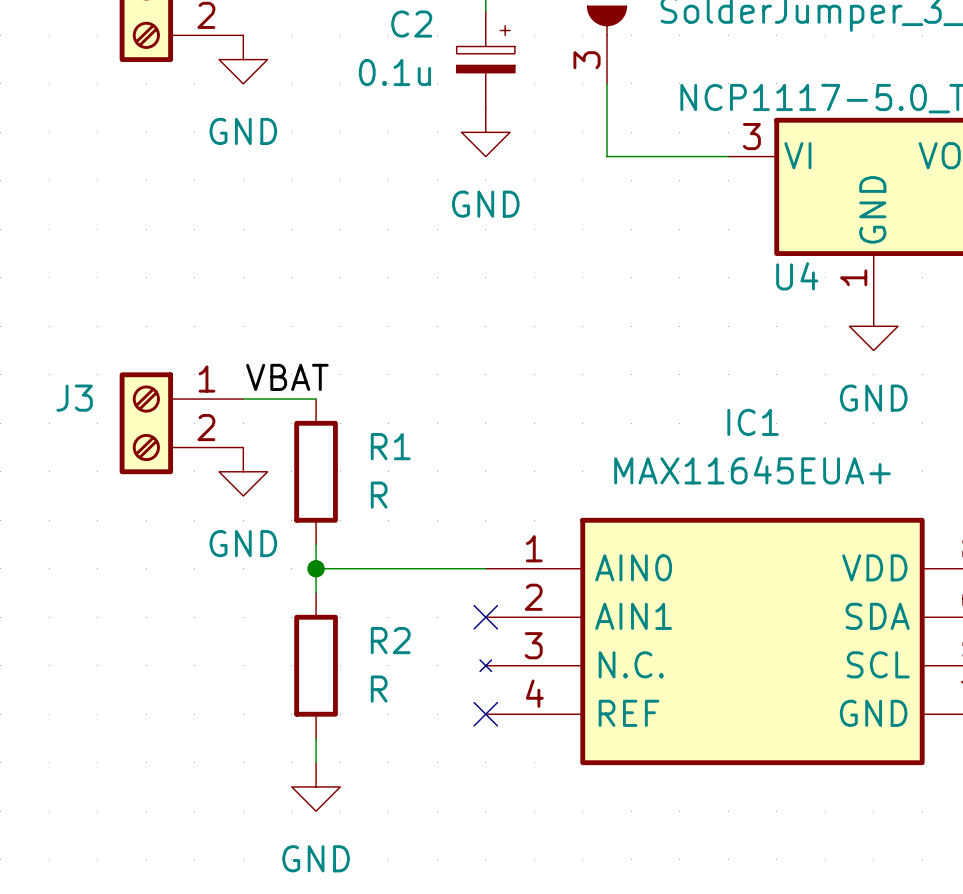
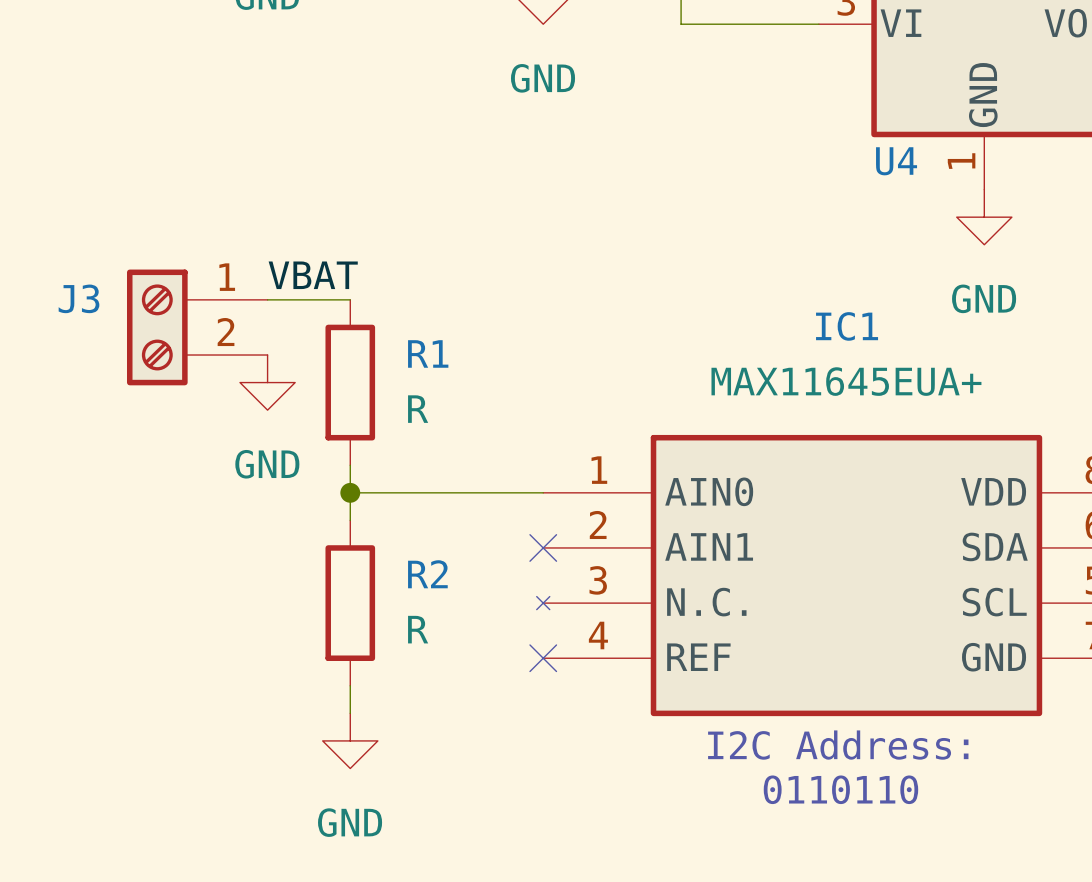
text: none -> I2C Address: (838, 745)
text: none -> 0110110 (840, 789)

